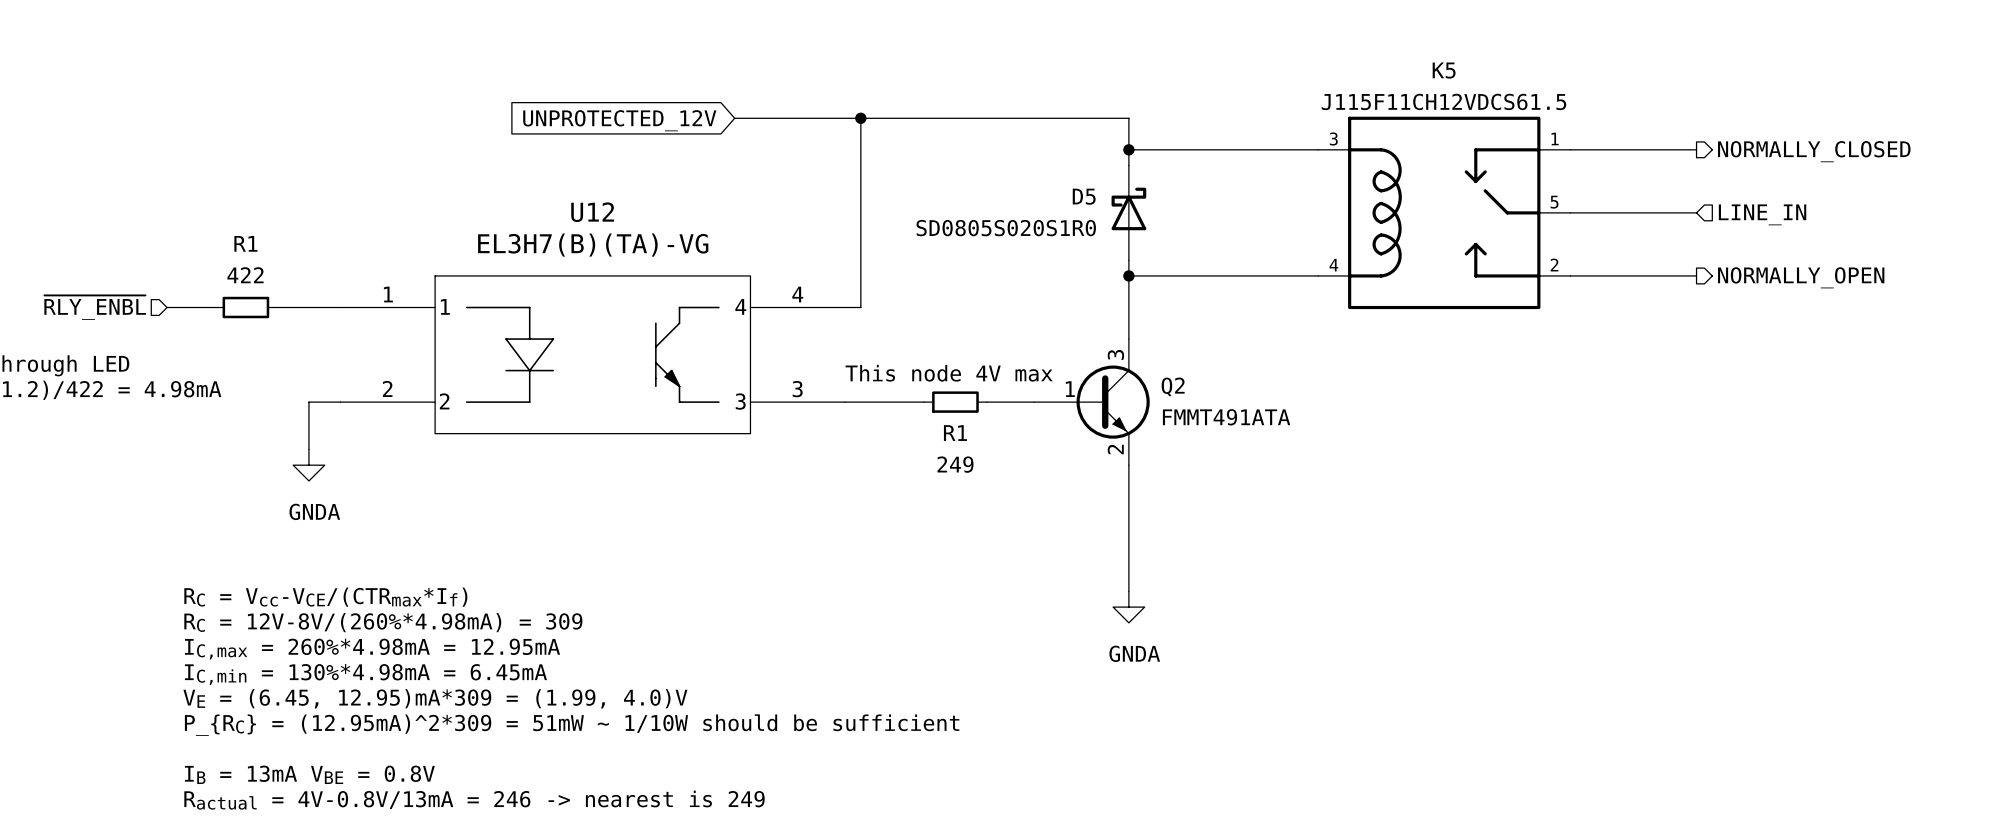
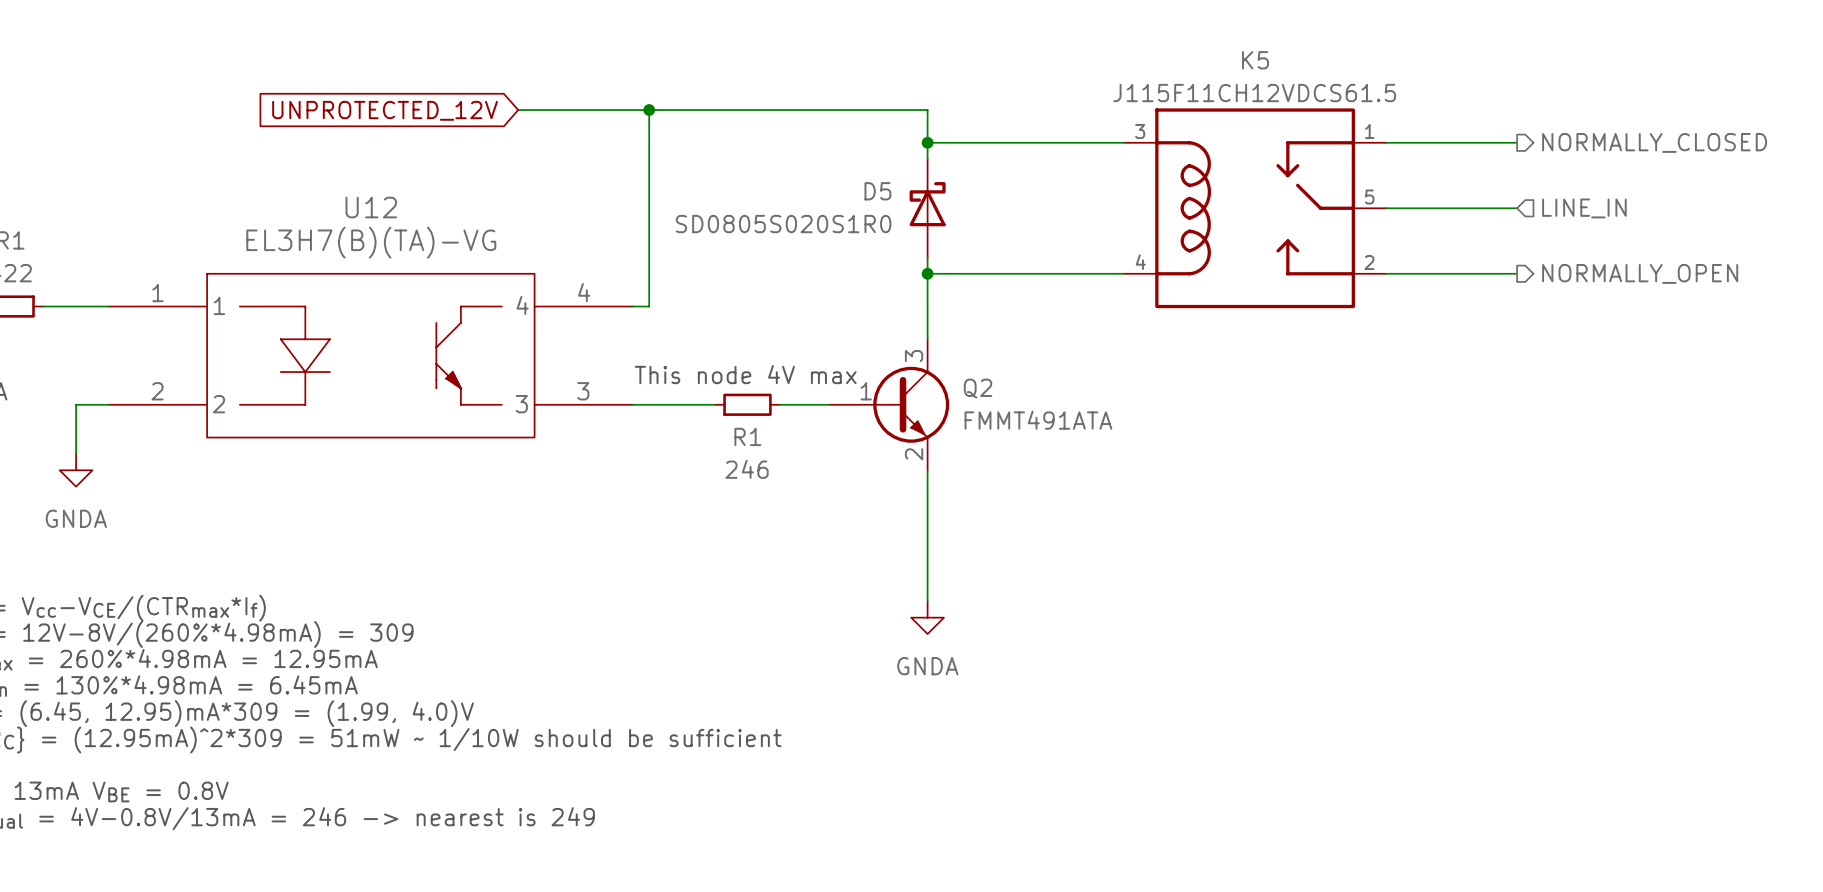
R1 value: 249 (955, 464) -> 246 (747, 469)

